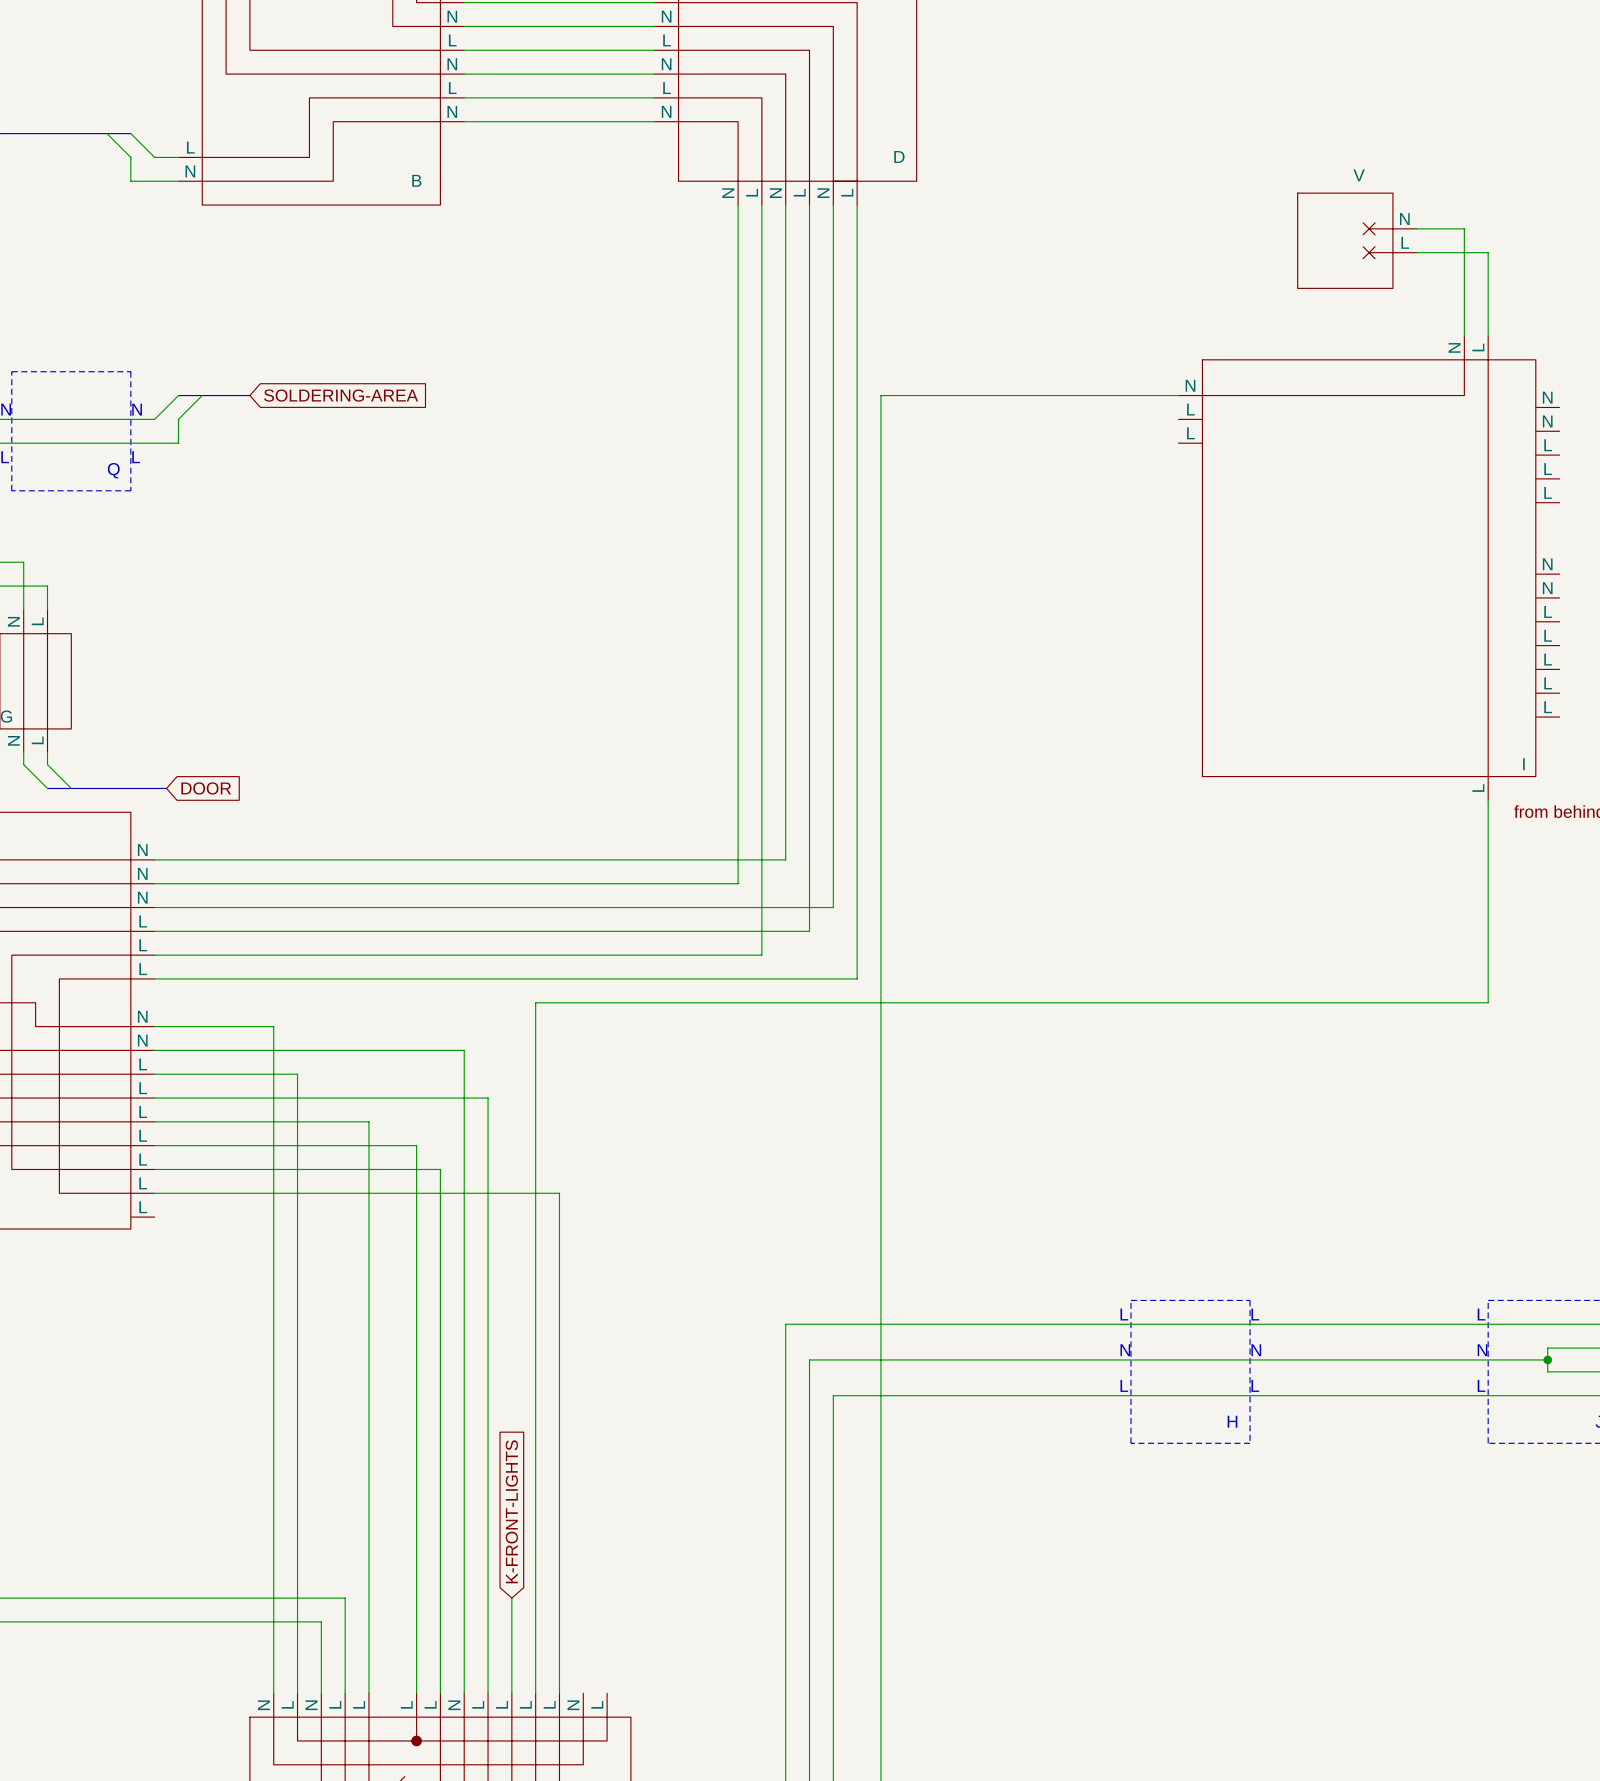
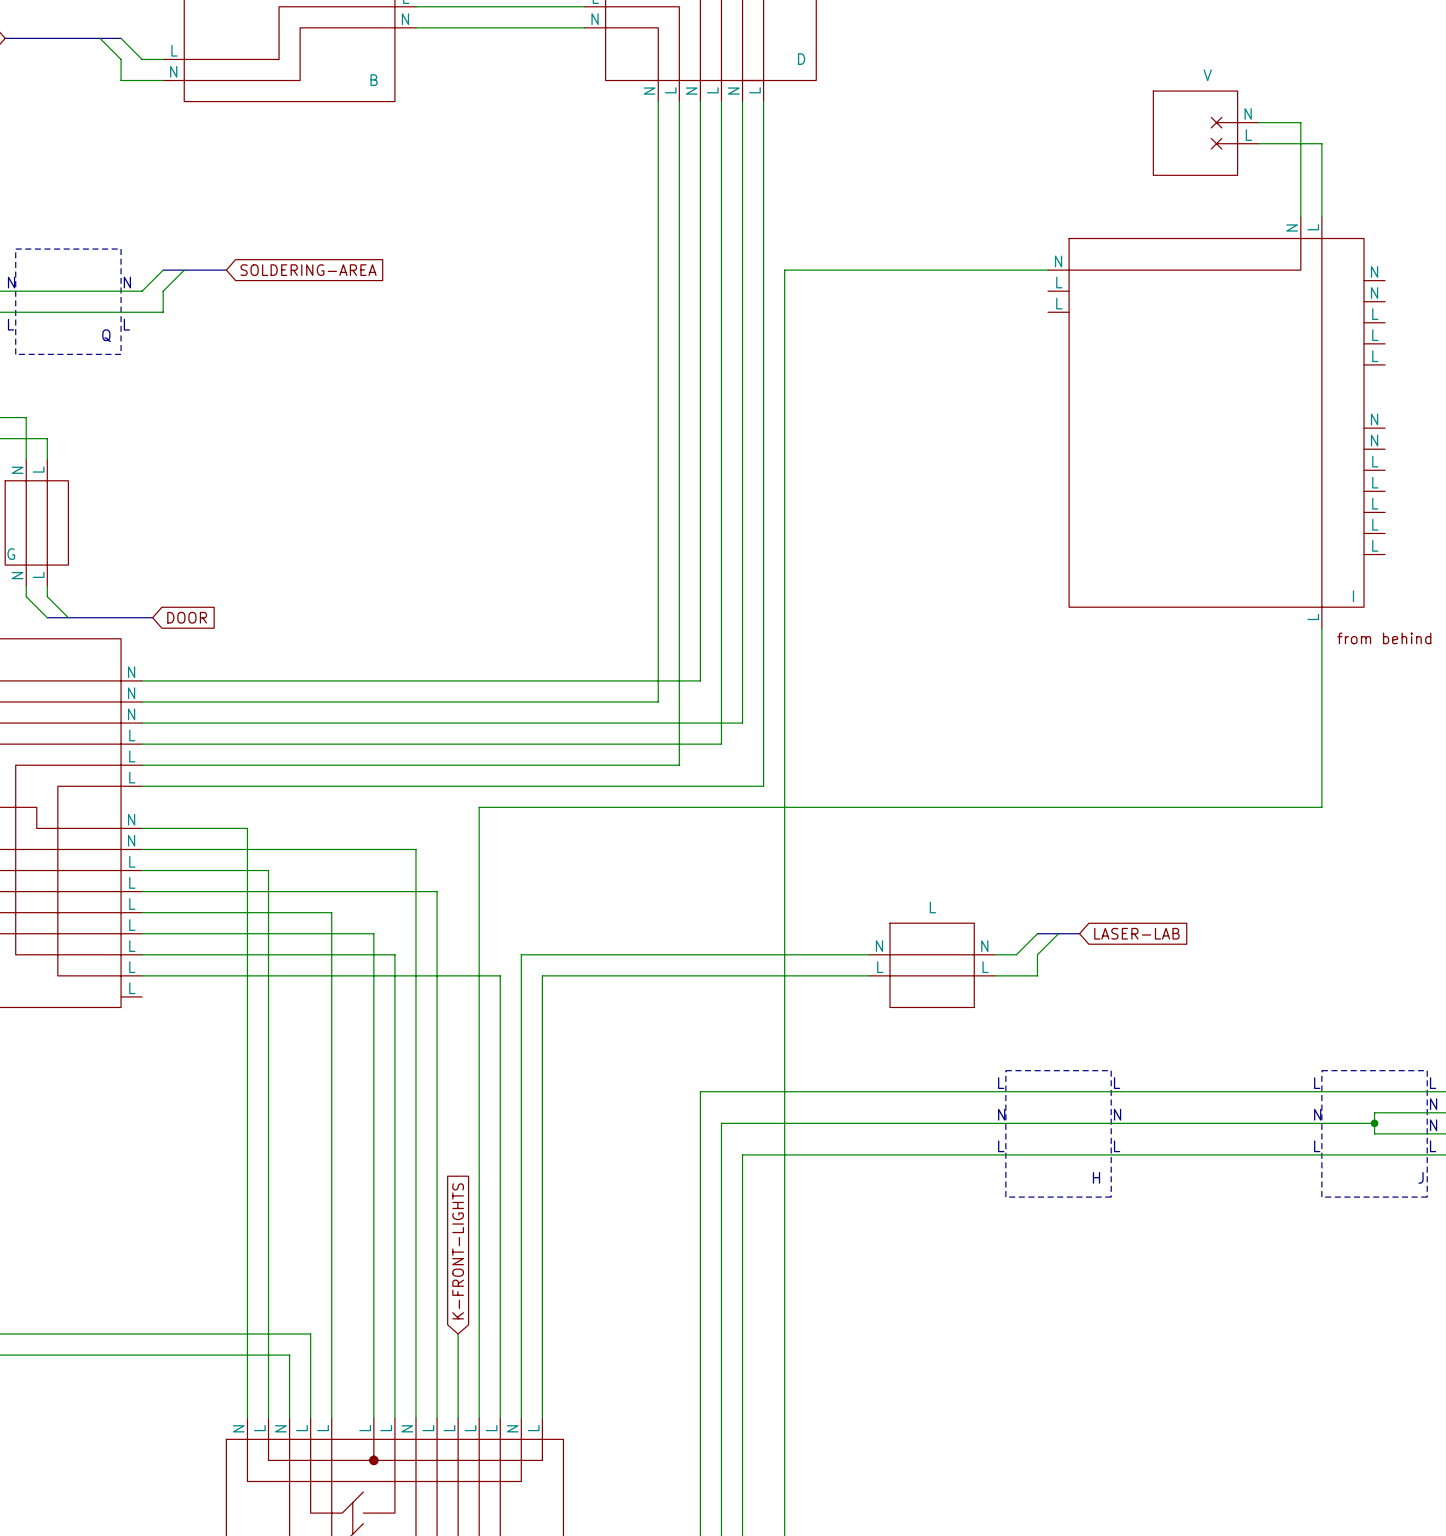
wire: none -> (1037, 933) (1016, 954) (995, 954)
bus: none -> (1037, 933) (1079, 933)
wire: none -> (1058, 933) (1037, 954) (1037, 975) (995, 975)
global label: none -> LASER-LAB (1136, 933)
wire: none -> (868, 954) (521, 954) (521, 1418)
part: none -> L (932, 965)
wire: none -> (868, 975) (542, 975) (542, 1418)

